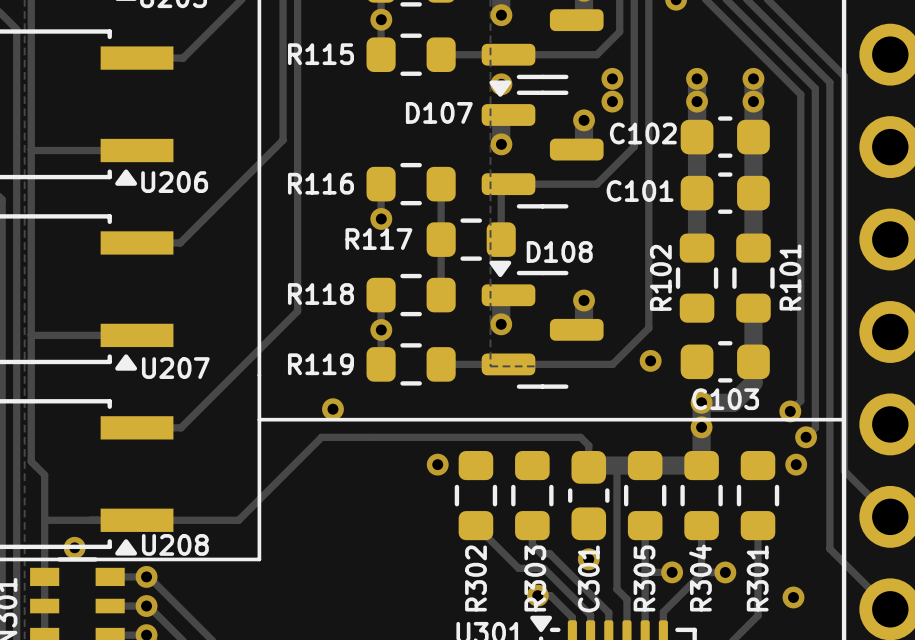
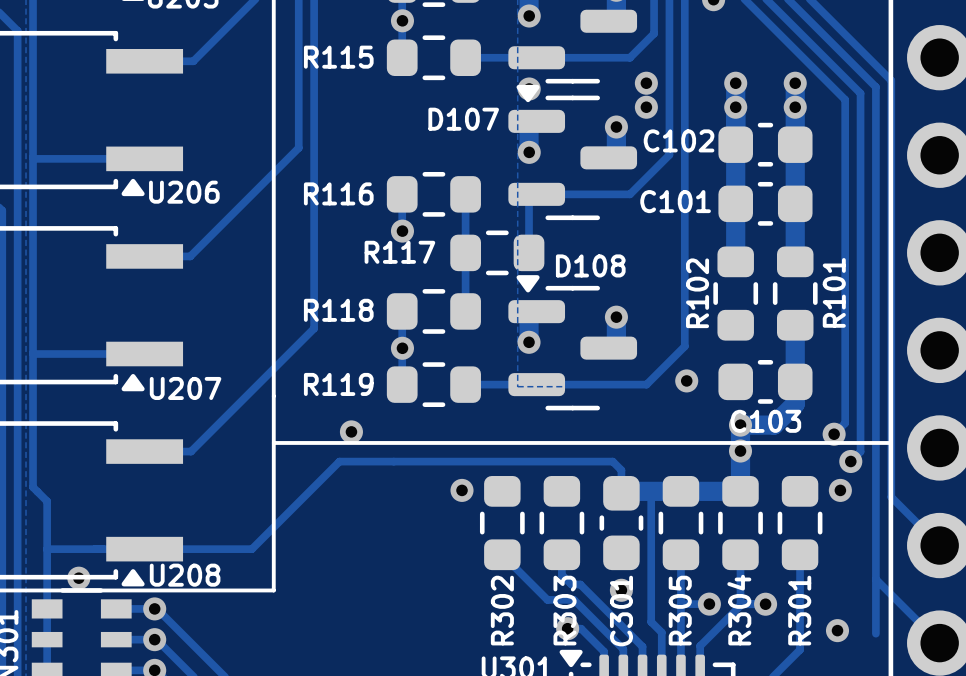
track: none -> (875, 579) (875, 633)

